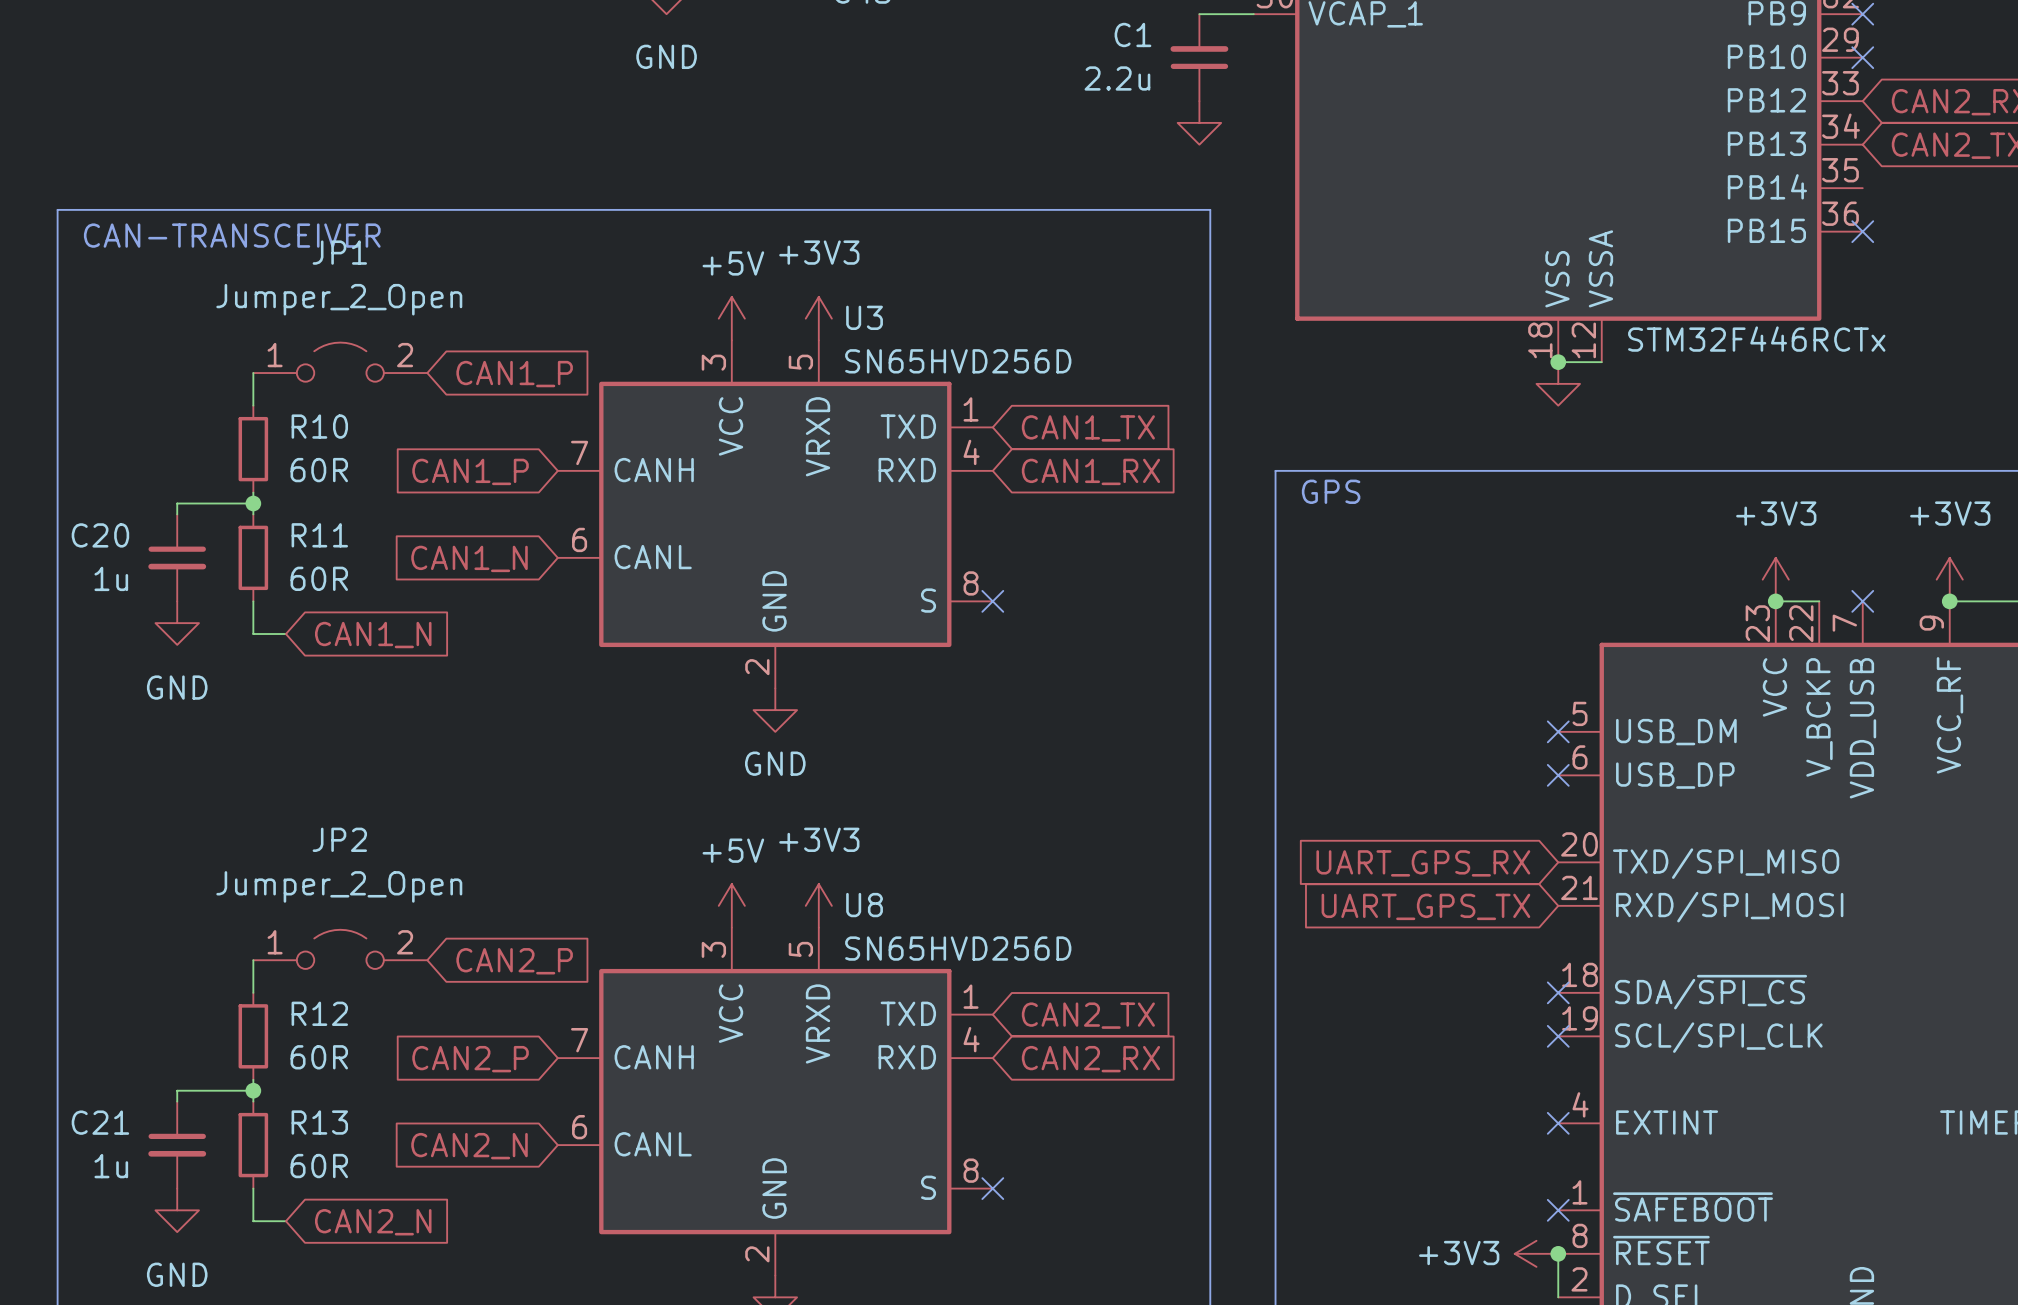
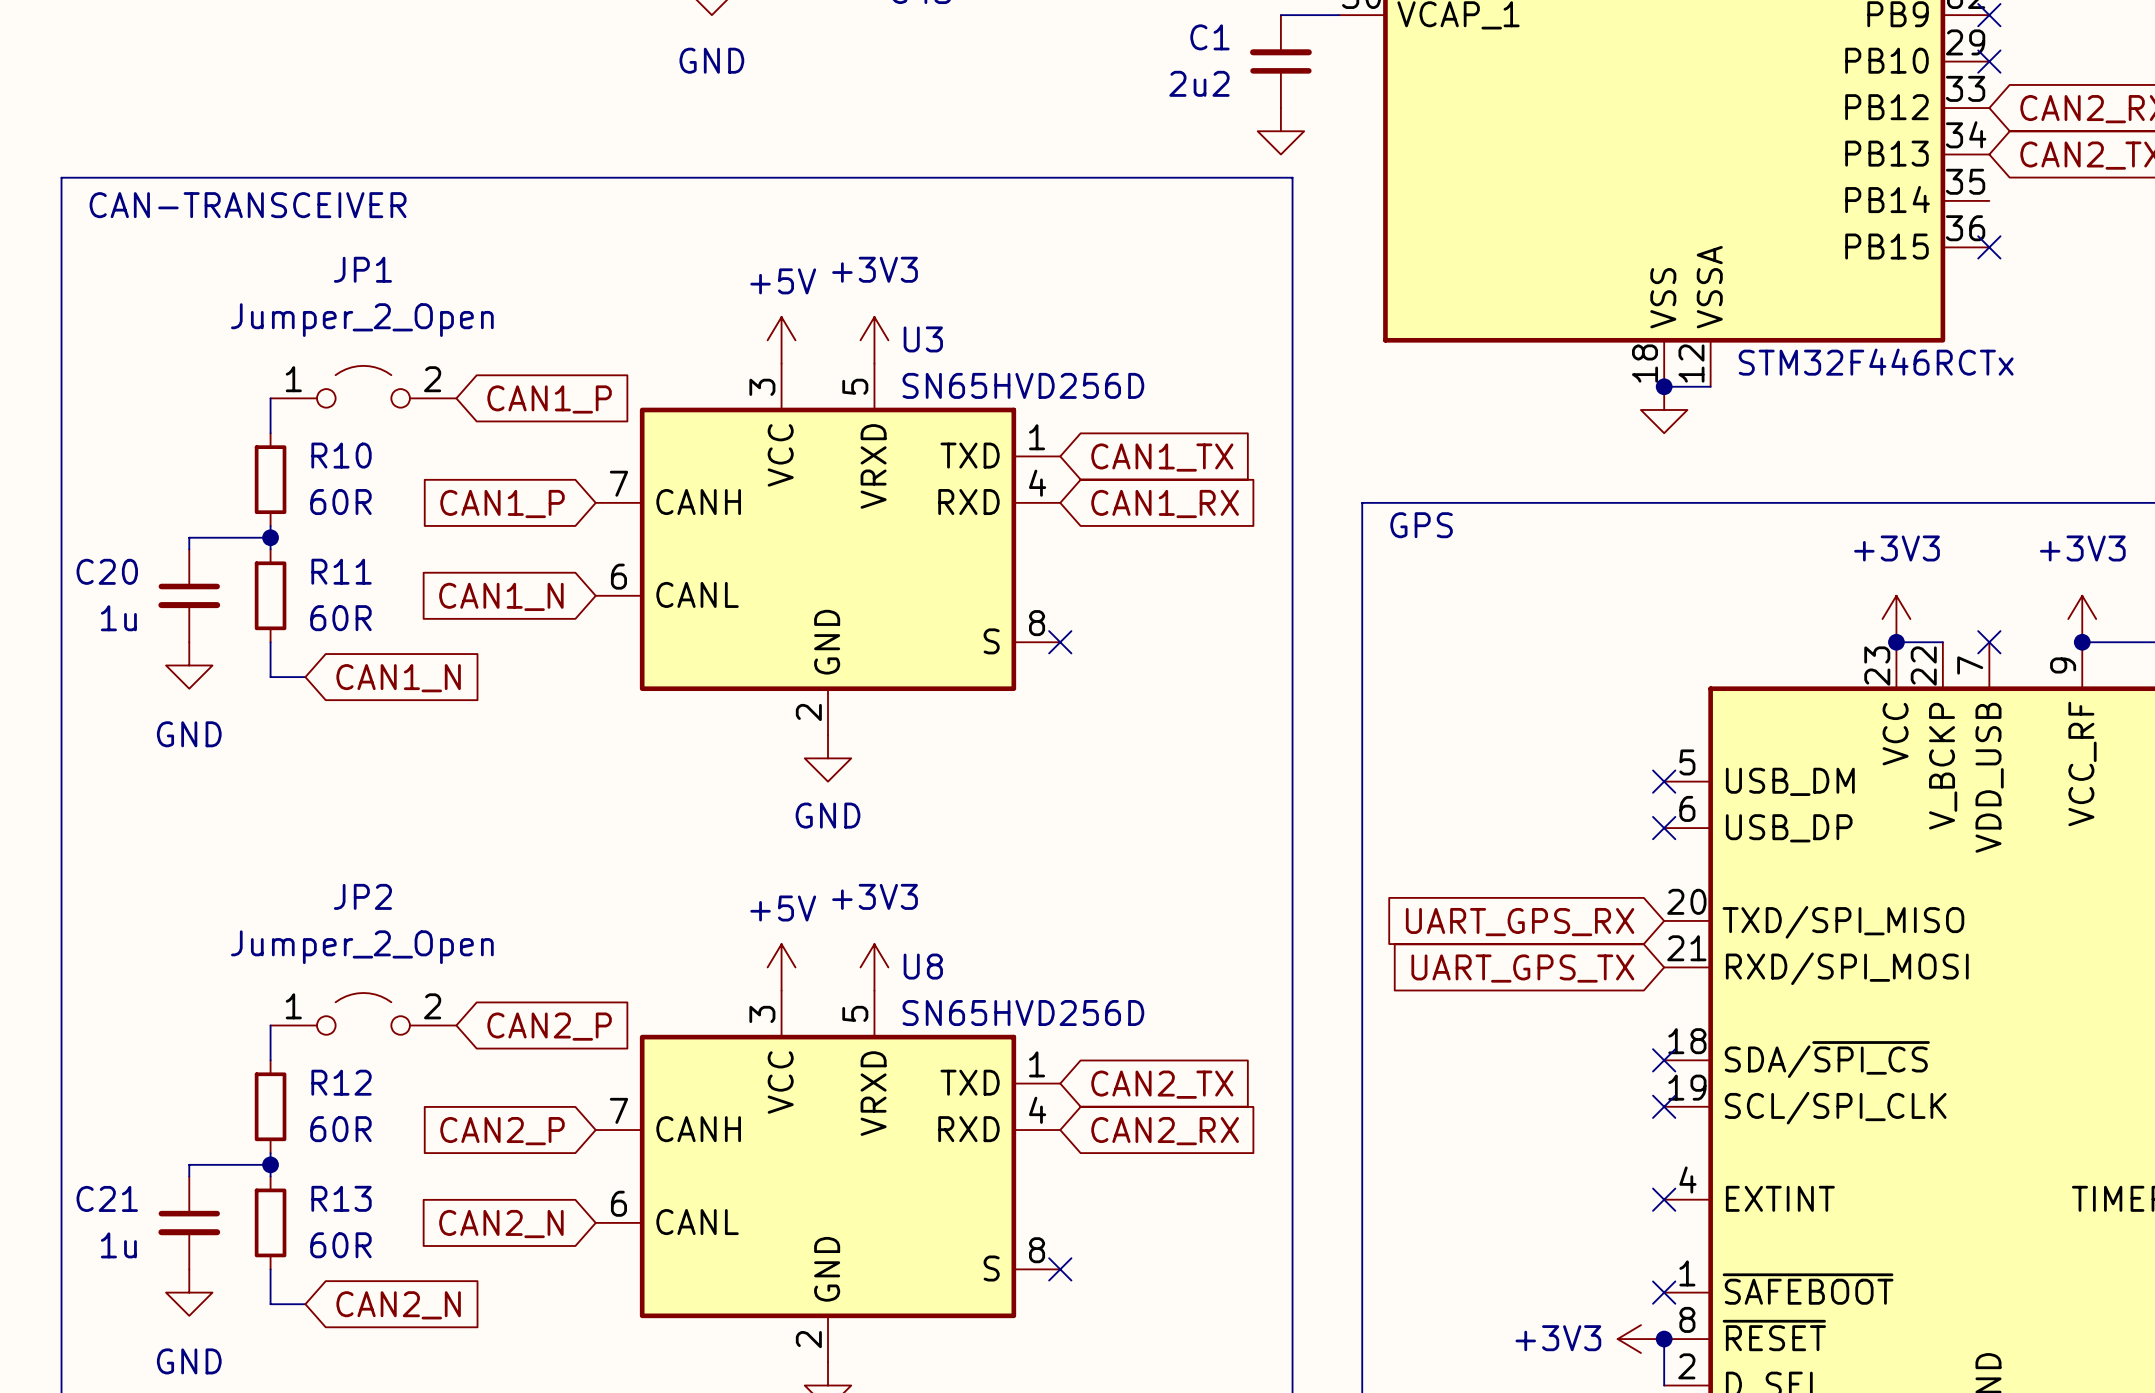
C1 value: 2.2u (1117, 78) -> 2u2 (1199, 83)
line: (57, 209) (1210, 209) -> (61, 224) (61, 177) (1292, 177) (1292, 224)
text position: CAN-TRANSCEIVER (232, 235) -> CAN-TRANSCEIVER (248, 205)

